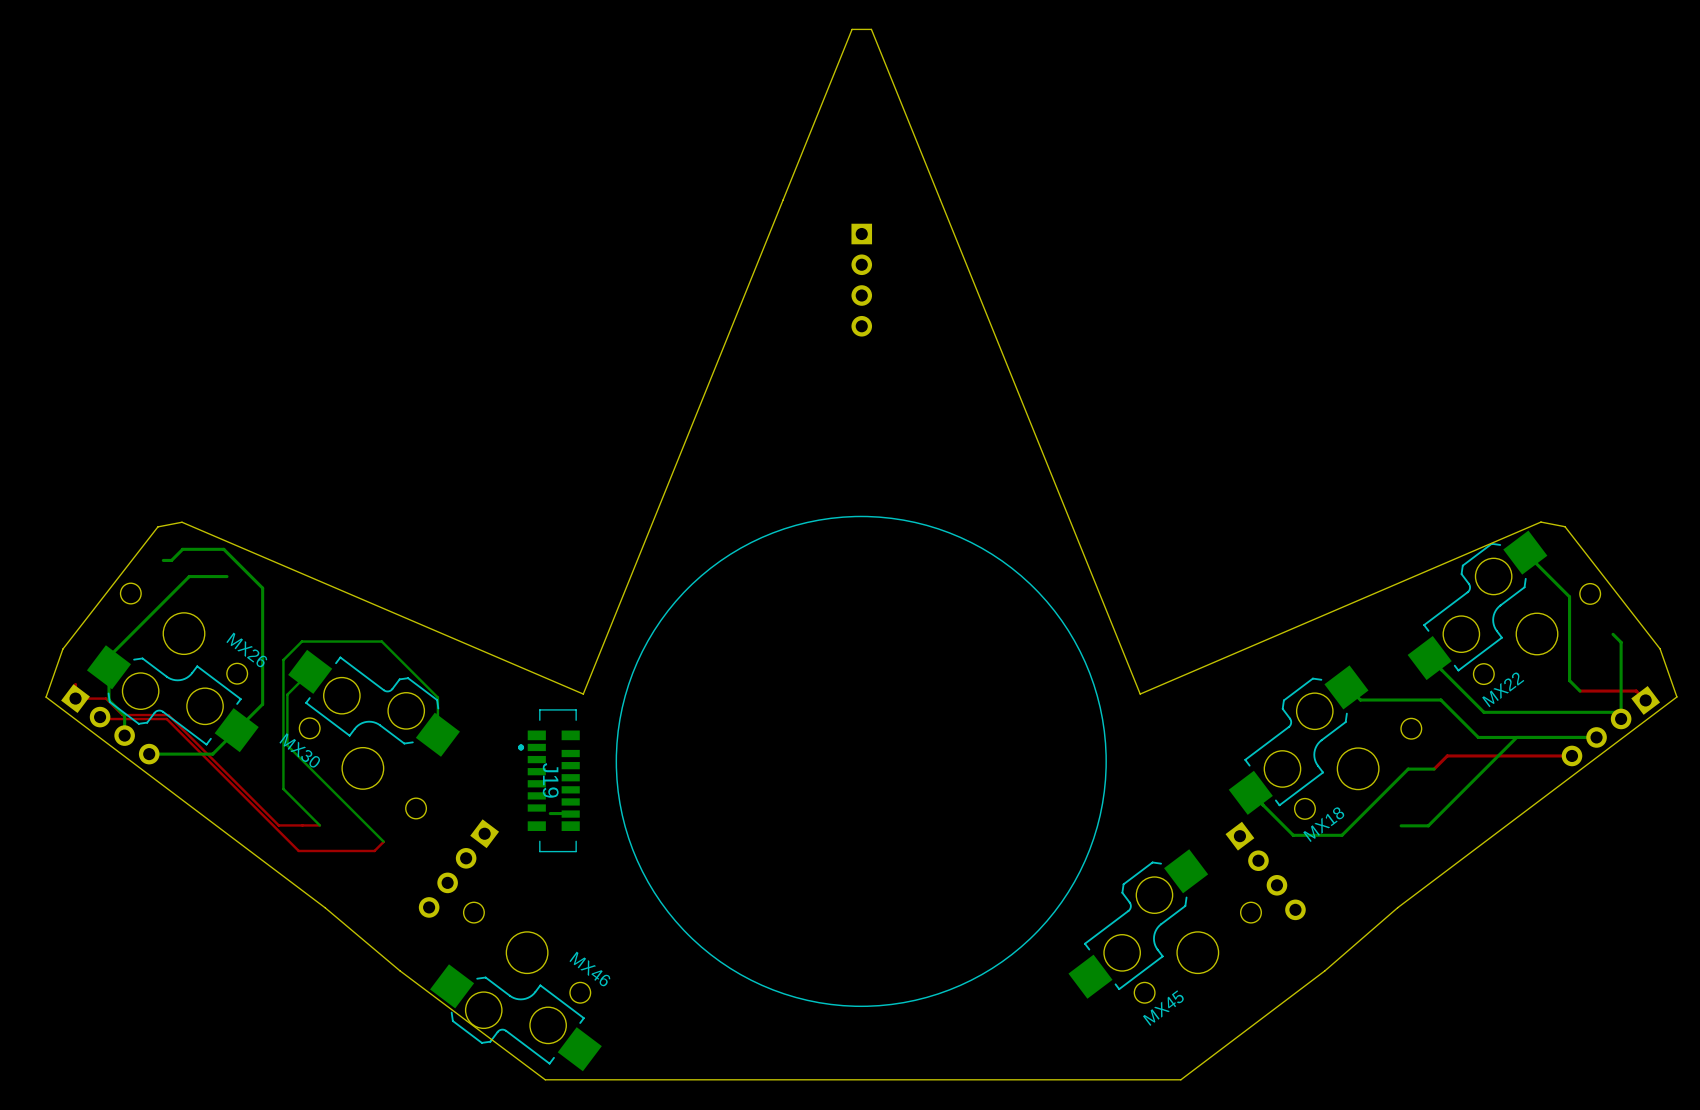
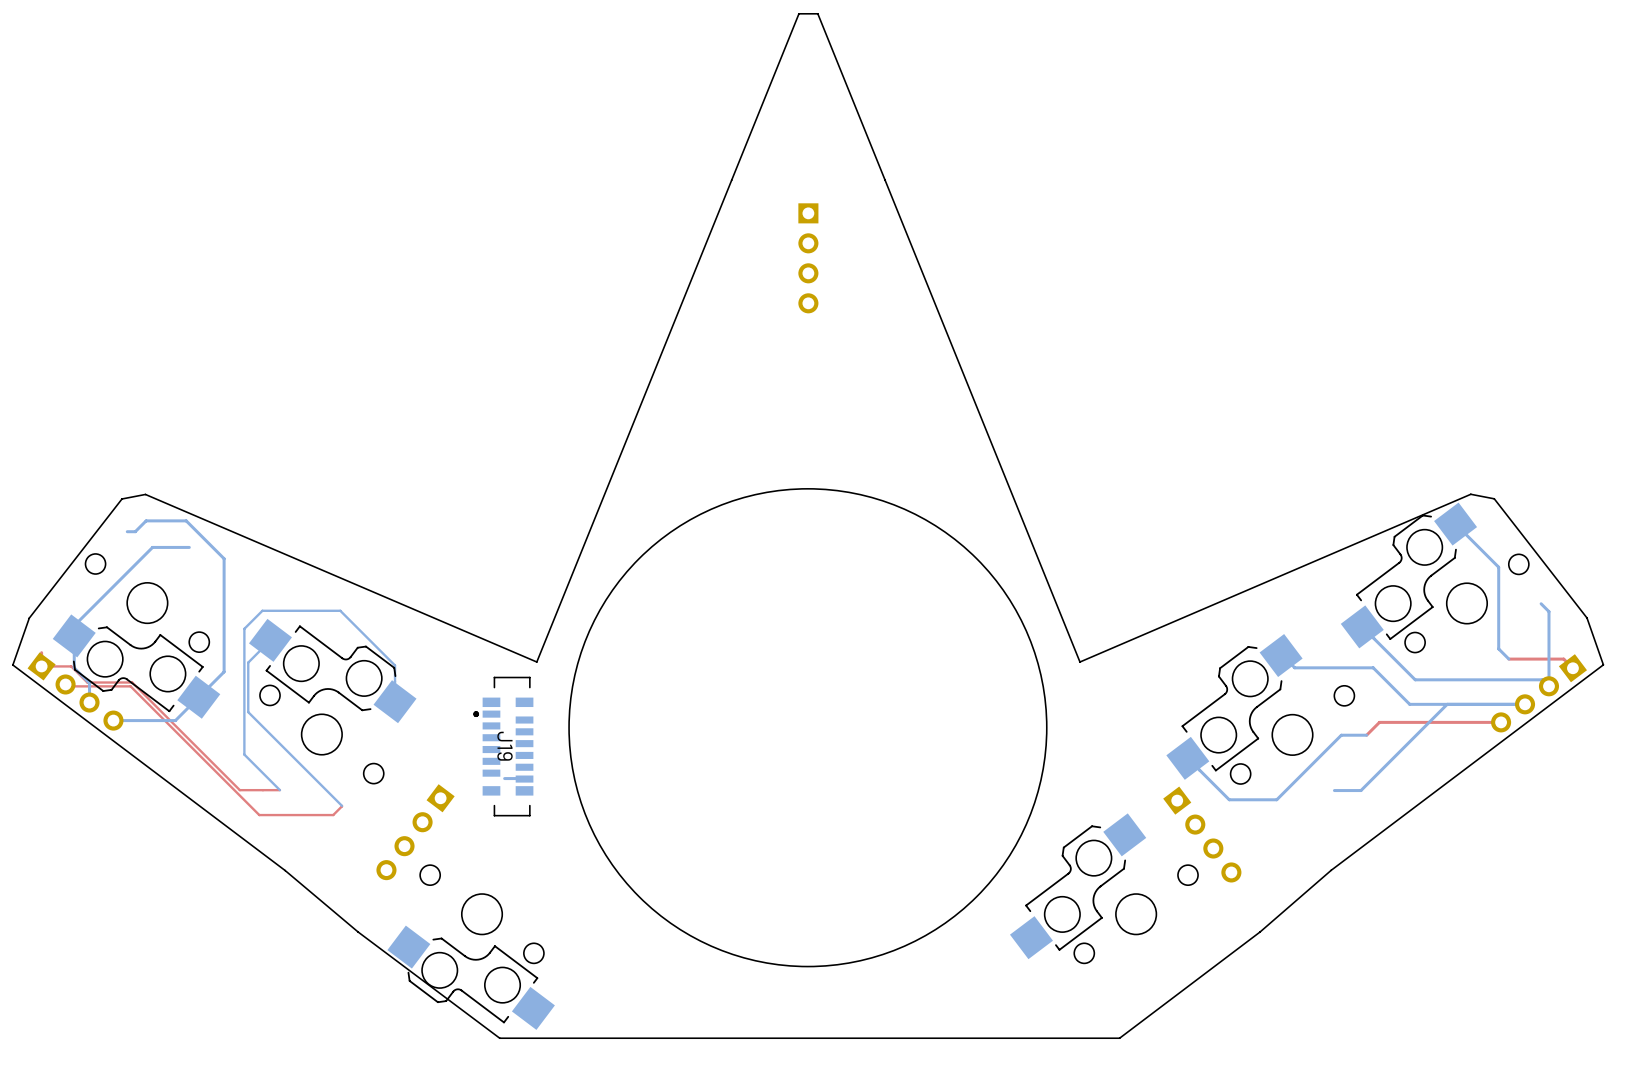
MX26 name: MX26 (247, 649) -> none
MX22 name: MX22 (1503, 689) -> none
MX30 name: MX30 (299, 750) -> none
MX18 name: MX18 (1323, 824) -> none
MX46 name: MX46 (590, 969) -> none
MX45 name: MX45 (1163, 1008) -> none

